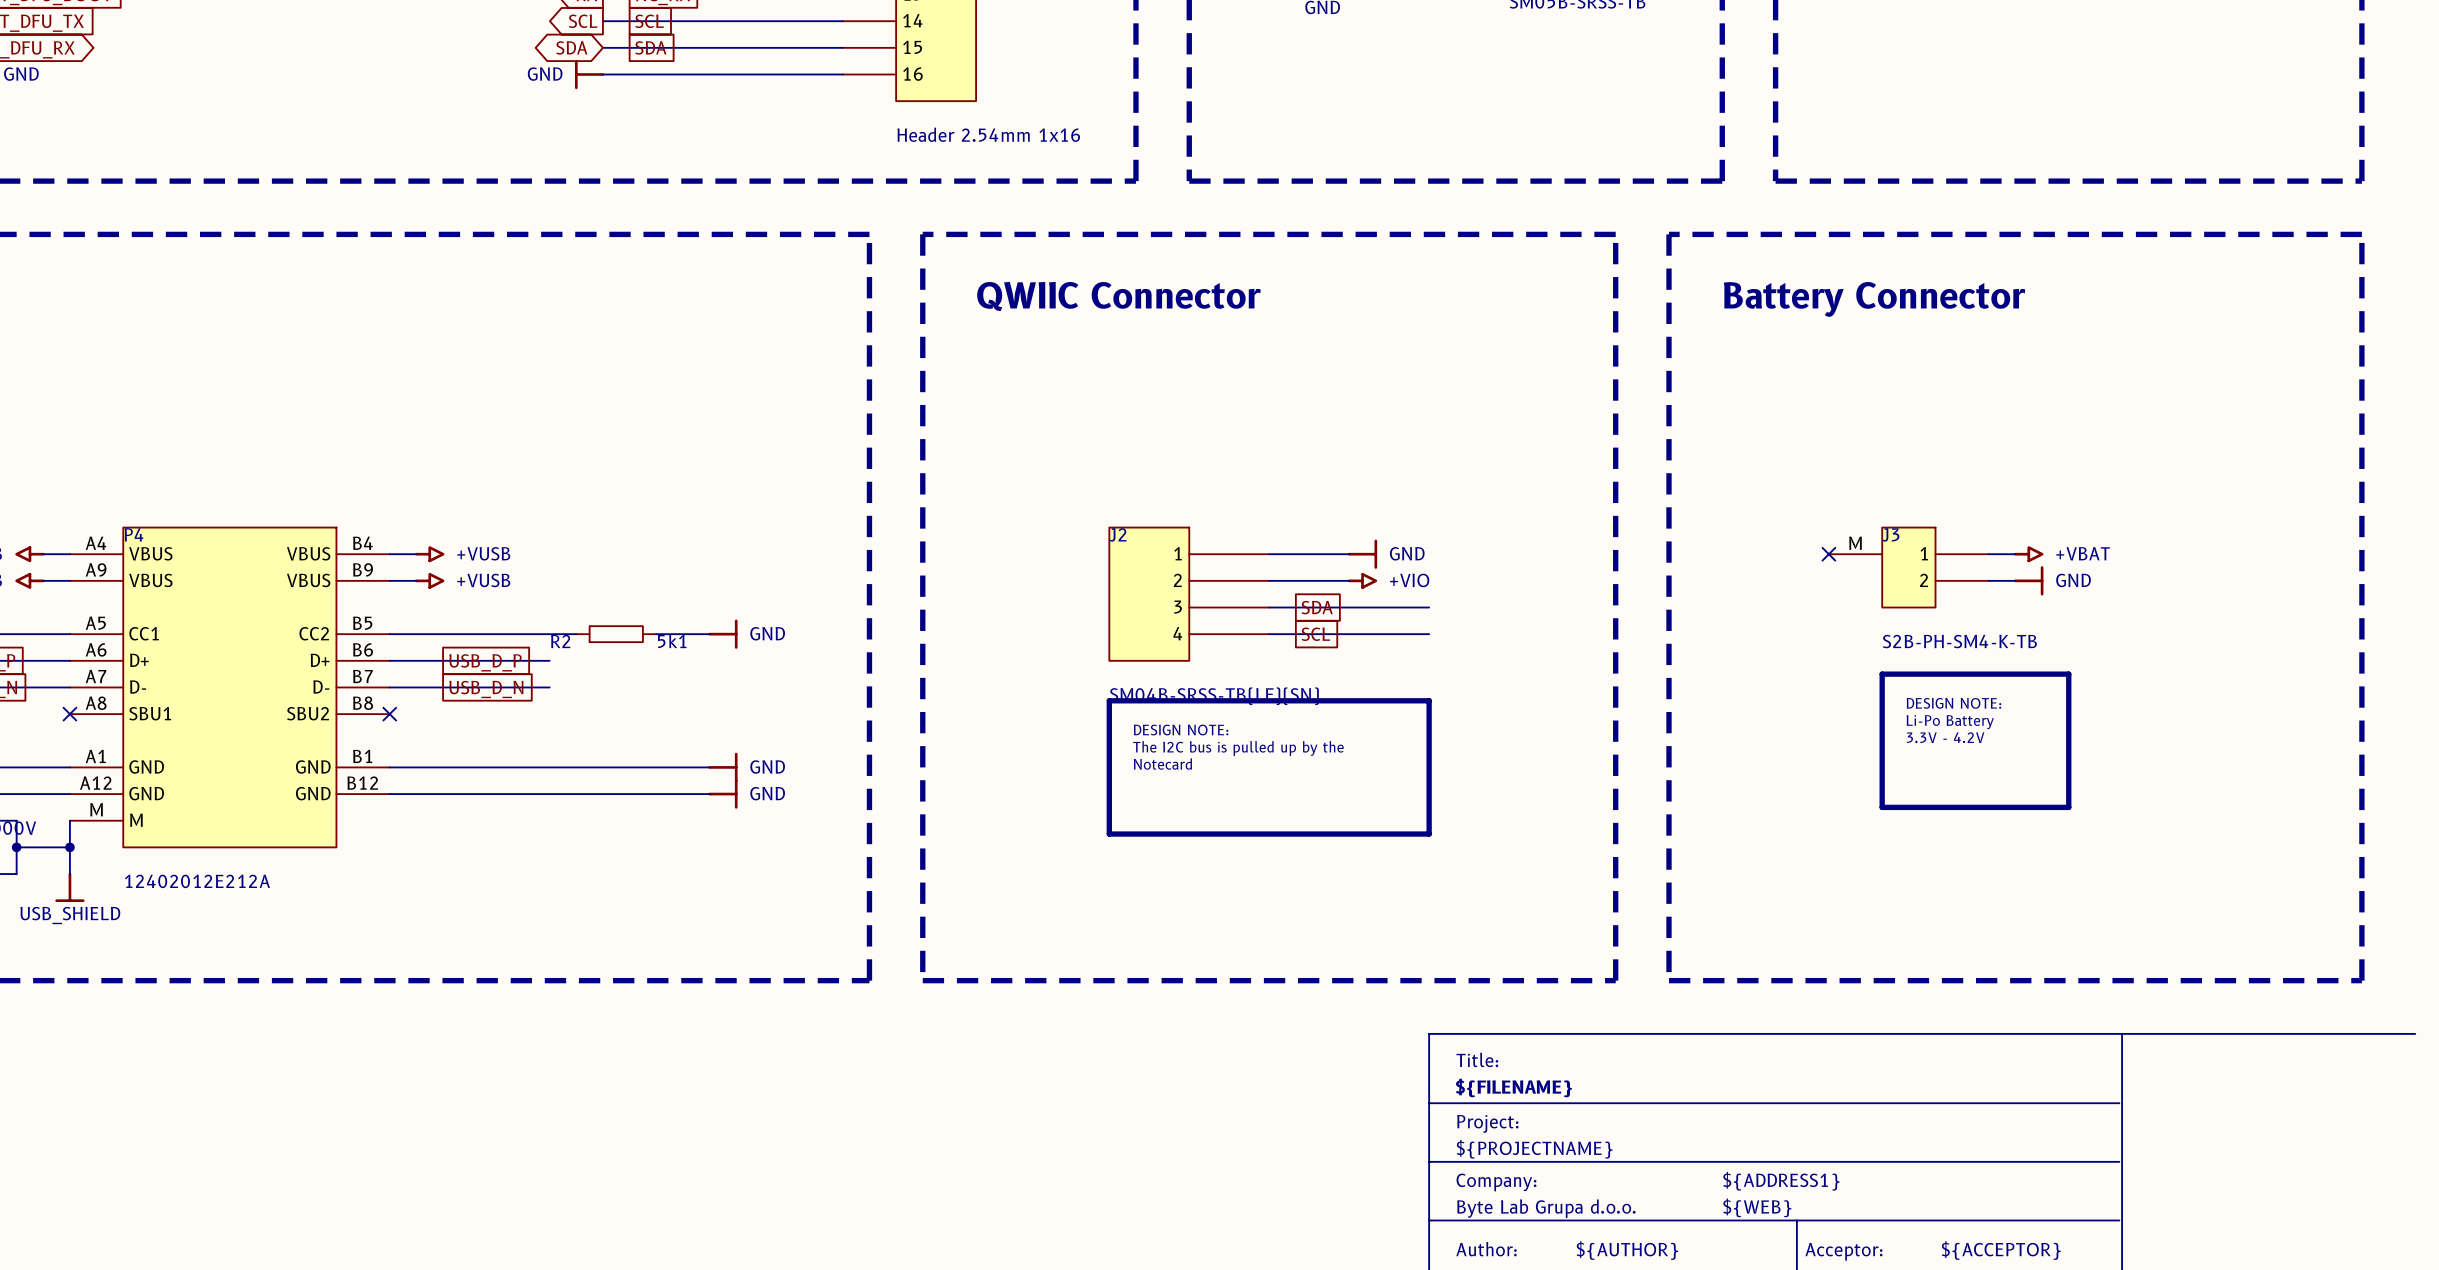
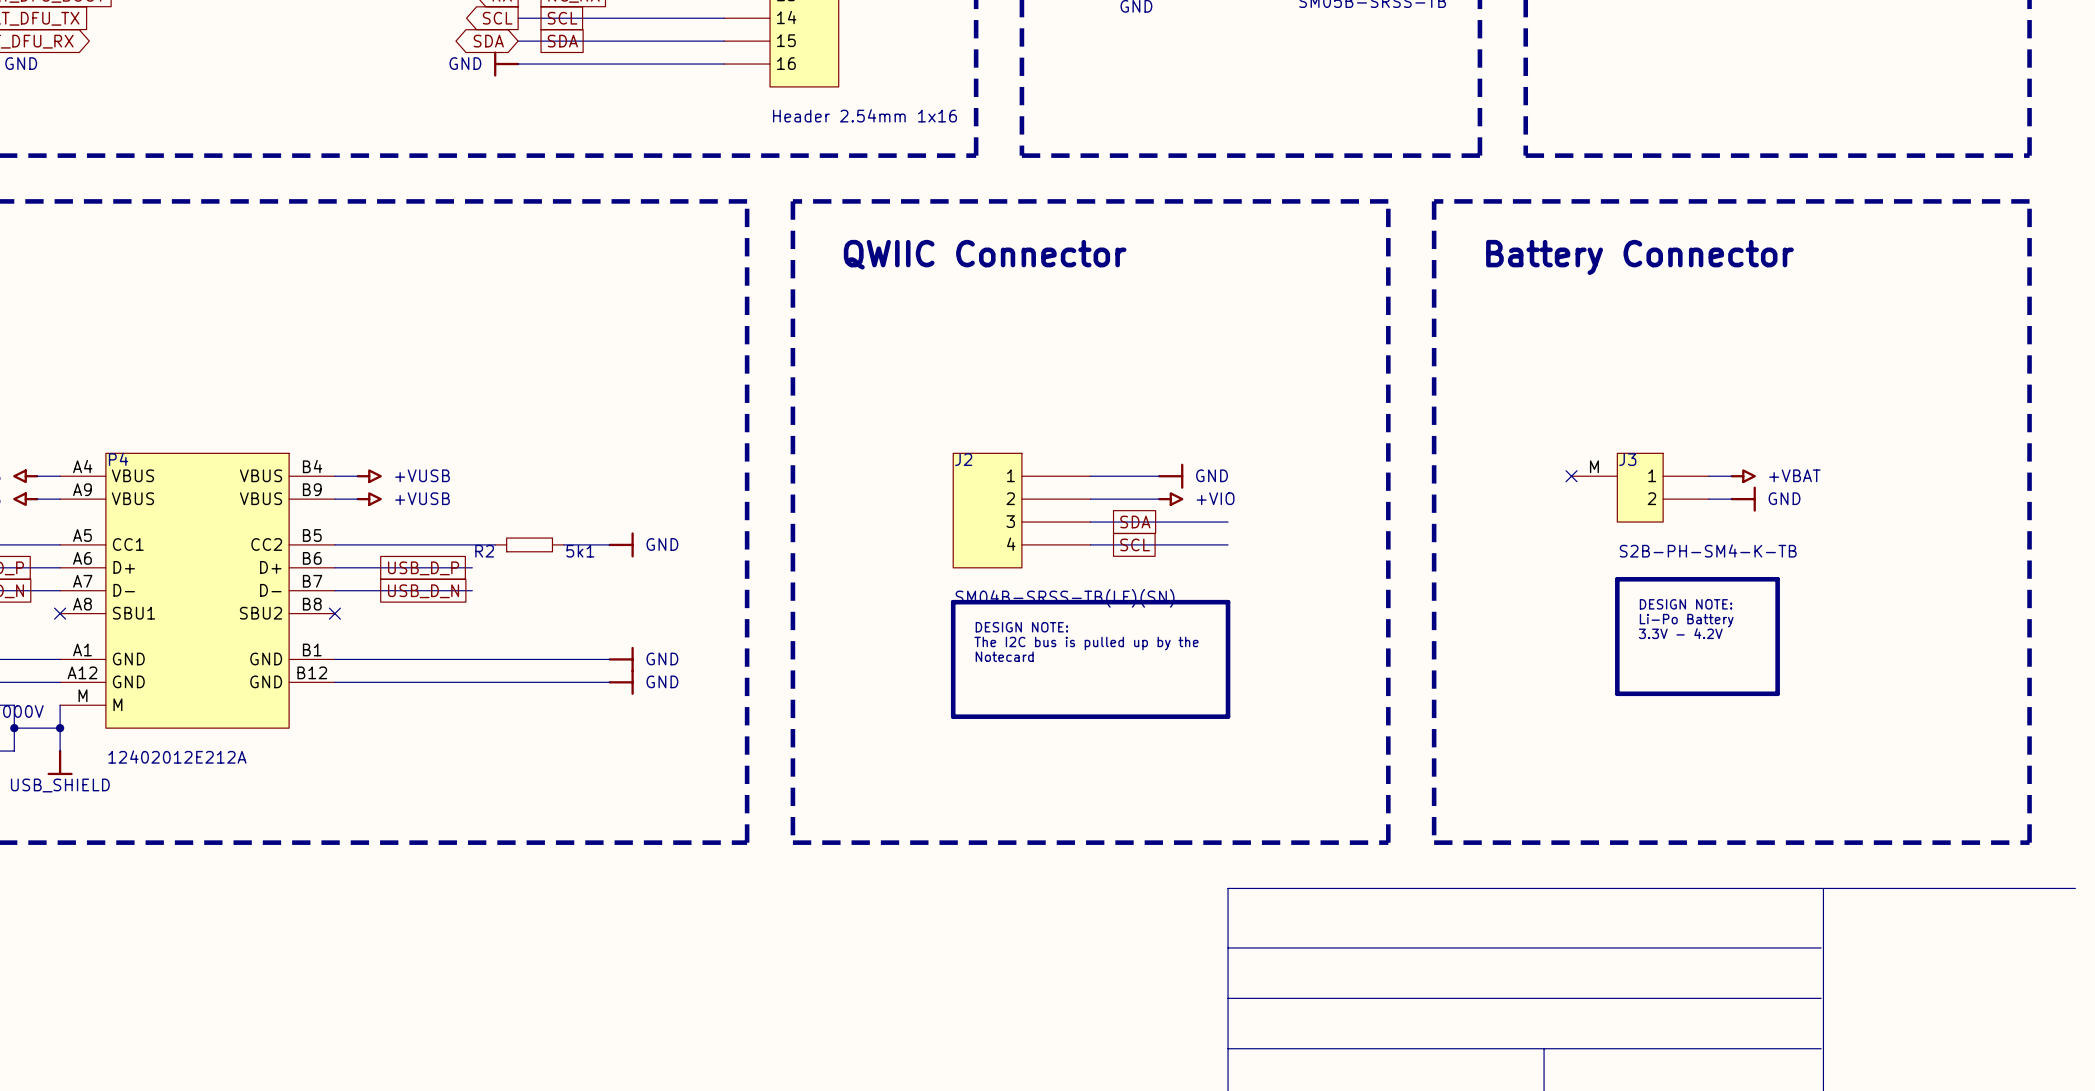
text: Title: (1477, 1059) -> none
text: ${FILENAME} (1513, 1087) -> none
text: Project: (1487, 1123) -> none
text: ${PROJECTNAME} (1534, 1149) -> none
text: ${ADDRESS1} (1781, 1181) -> none
text: Company: (1496, 1182) -> none
text: ${WEB} (1757, 1207) -> none
text: Byte Lab Grupa d.o.o. (1546, 1208) -> none
text: Author: (1486, 1249) -> none
text: ${AUTHOR} (1627, 1250) -> none
text: ${ACCEPTOR} (2001, 1250) -> none
text: Acceptor: (1843, 1251) -> none

